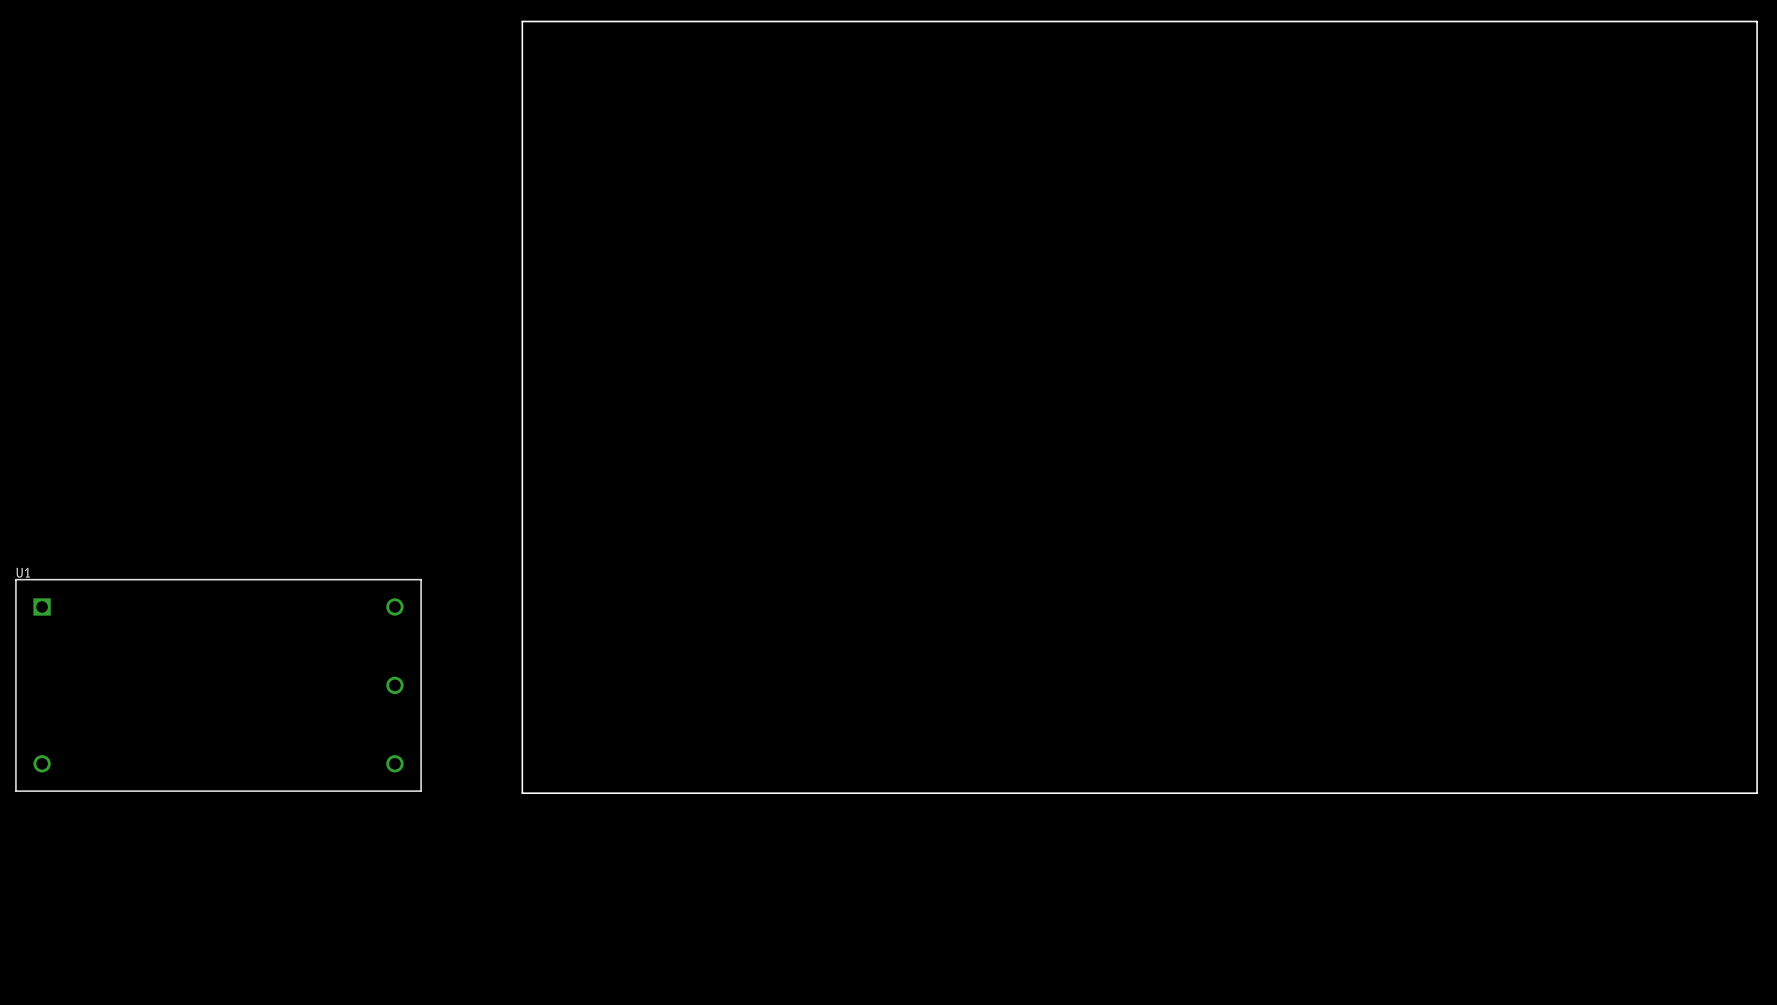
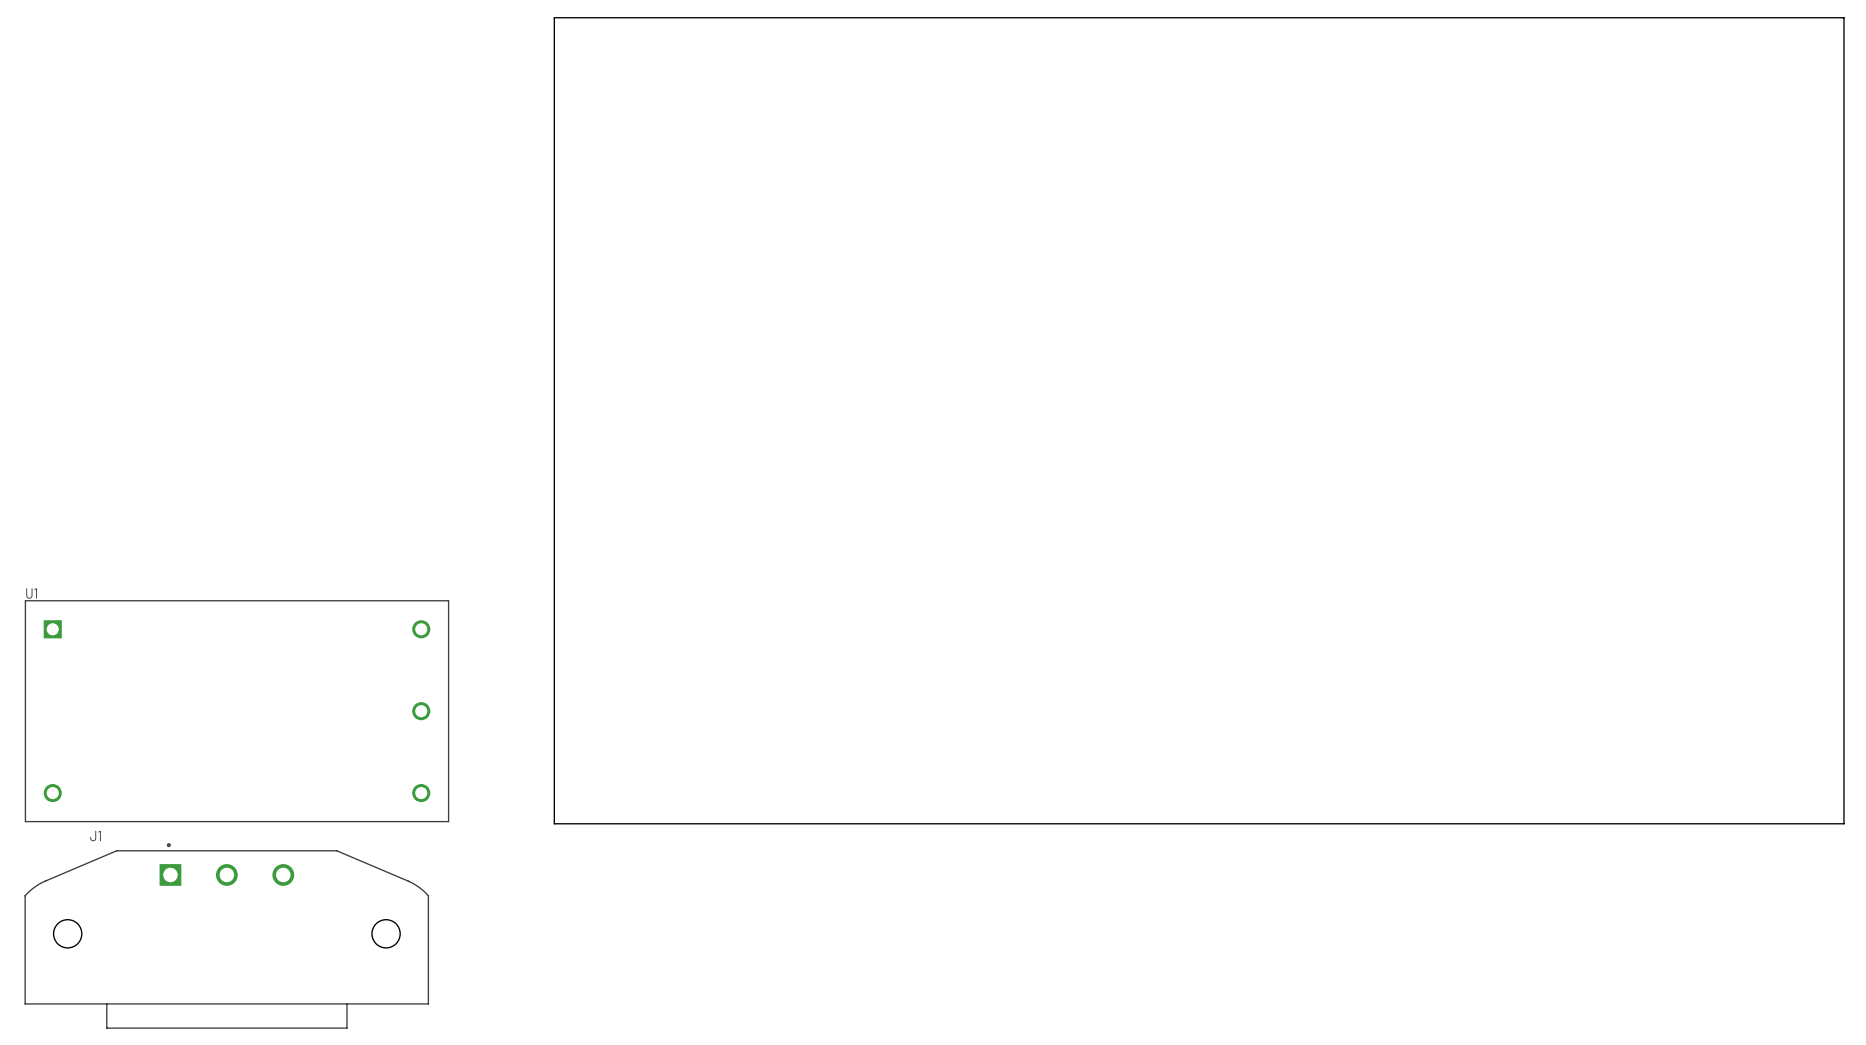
J1: none -> (226, 935)

